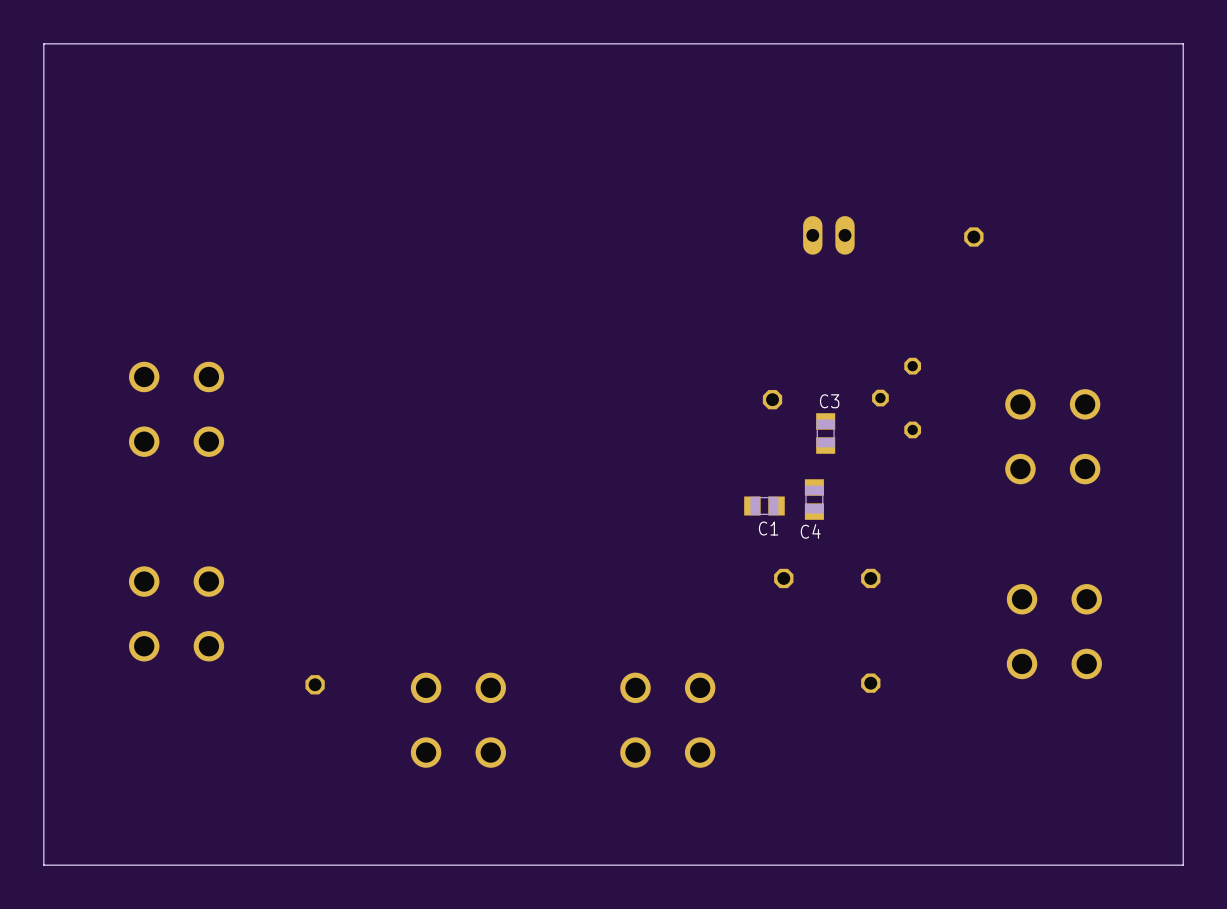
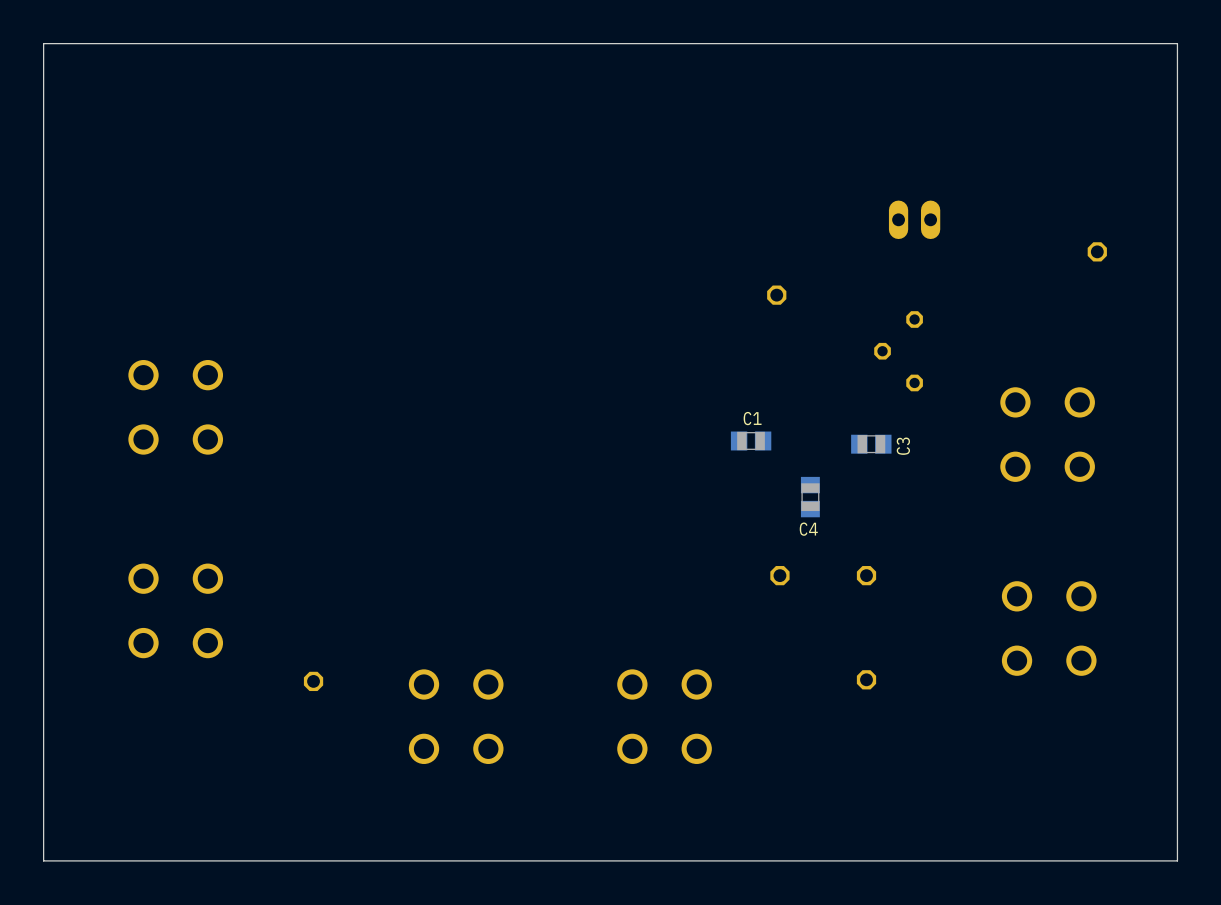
part position: (828, 235) -> (914, 219)
part: (973, 236) -> none
part: none -> (1097, 251)
part: none -> (776, 295)
part position: (896, 398) -> (898, 351)
part: (772, 399) -> none
C3 rotation: 0° (825, 433) -> 90° clockwise (871, 444)
C3 position: (825, 433) -> (871, 444)
C1 position: (764, 505) -> (751, 440)
C1 name position: C1 (768, 528) -> C1 (752, 418)

